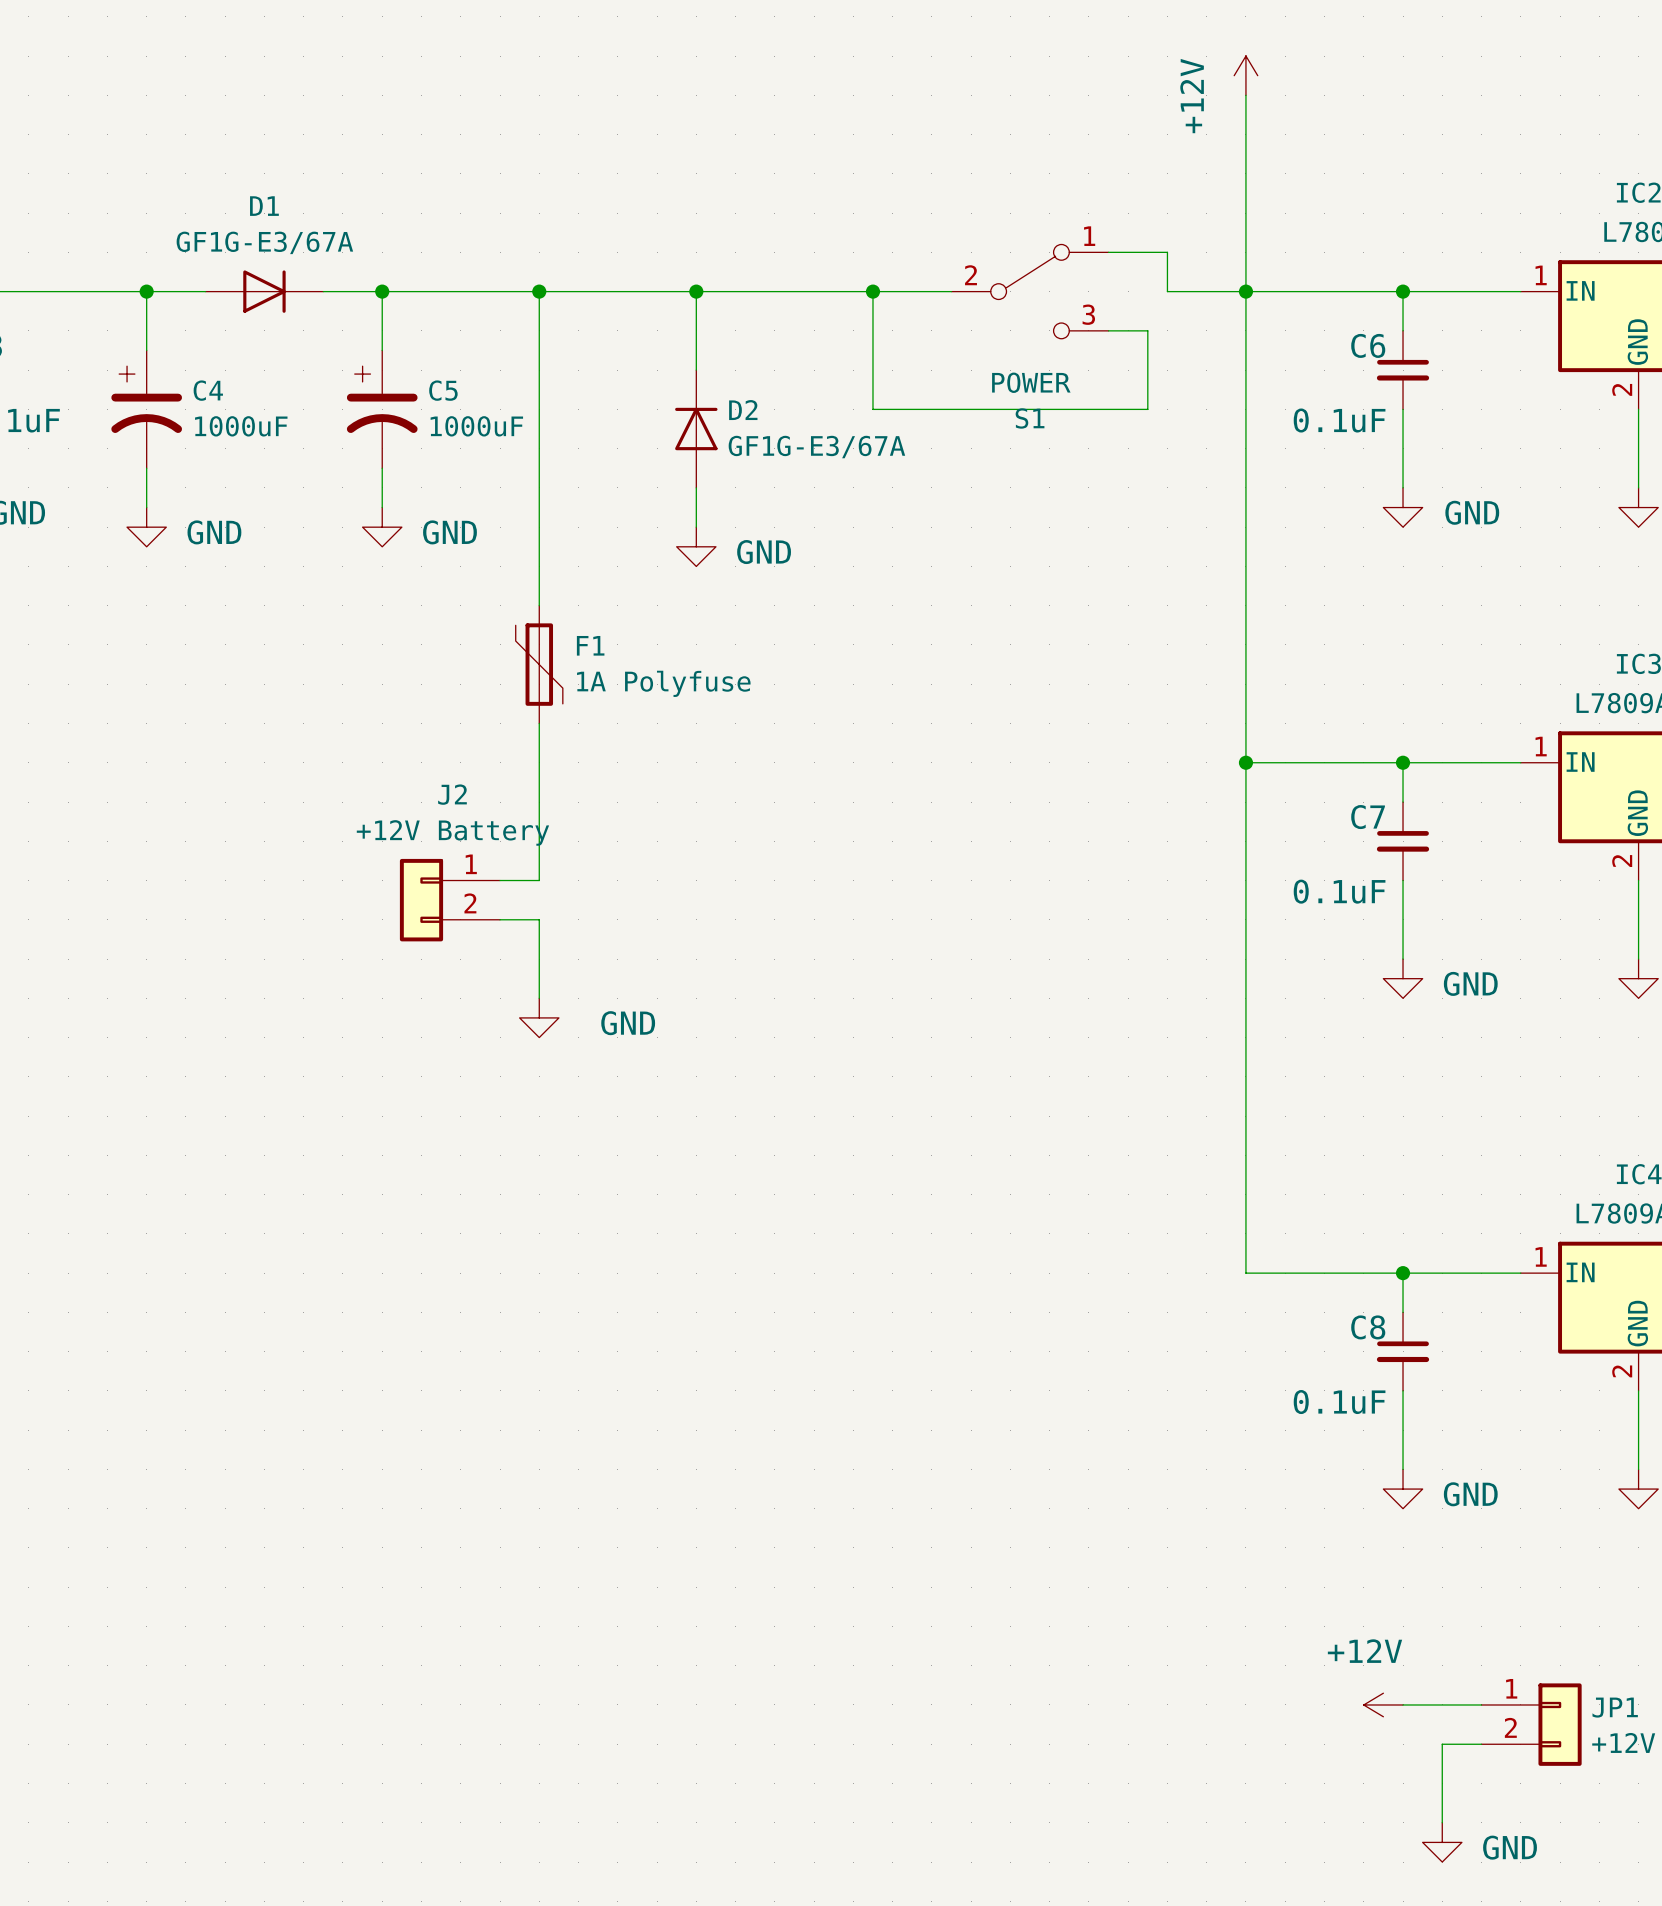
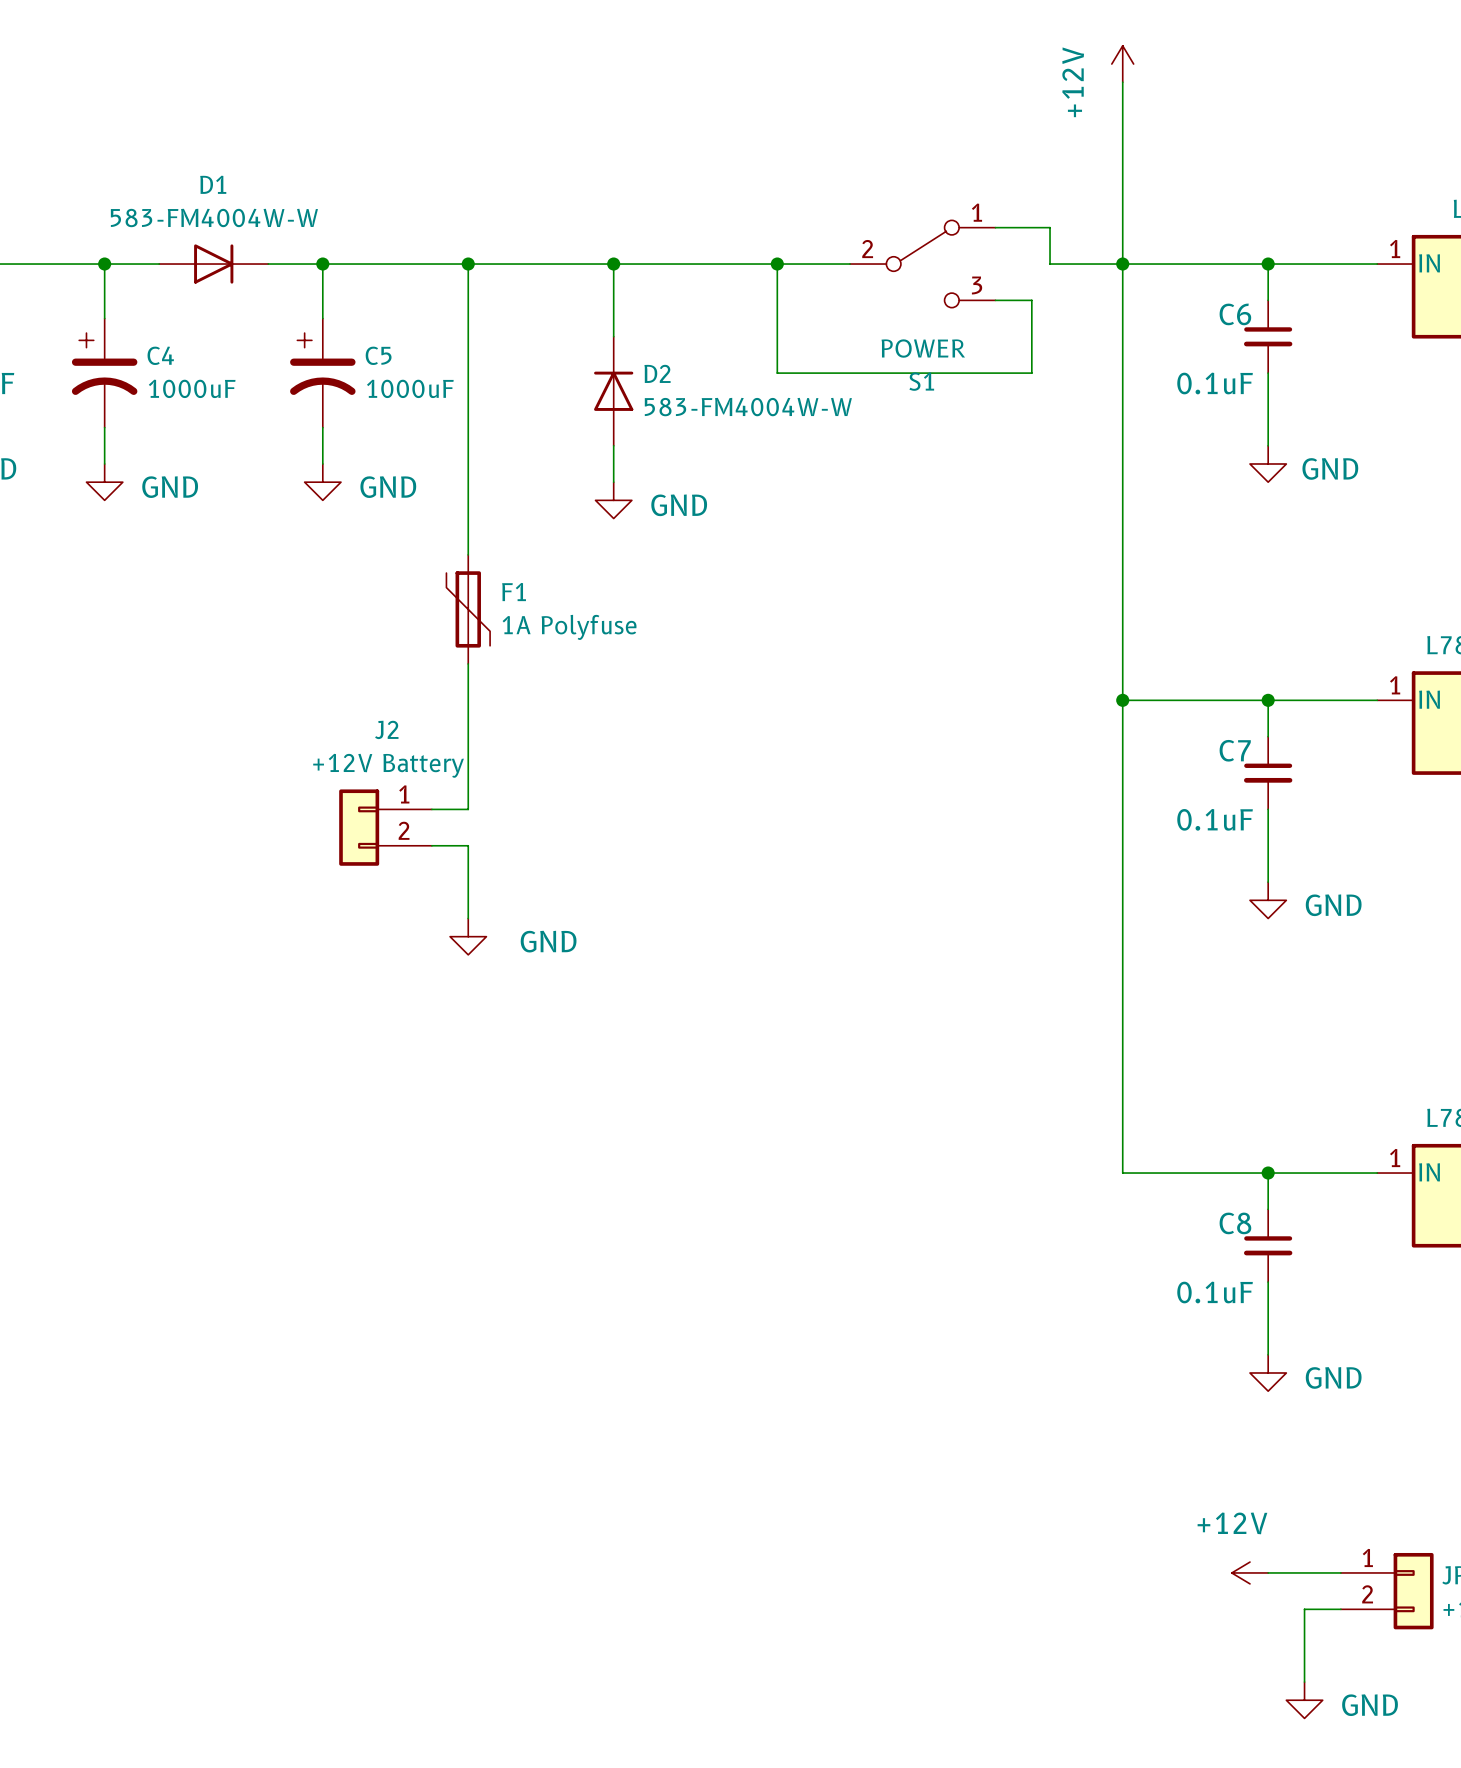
D1 value: GF1G-E3/67A (264, 242) -> 583-FM4004W-W (214, 217)
D2 value: GF1G-E3/67A (816, 447) -> 583-FM4004W-W (748, 407)

